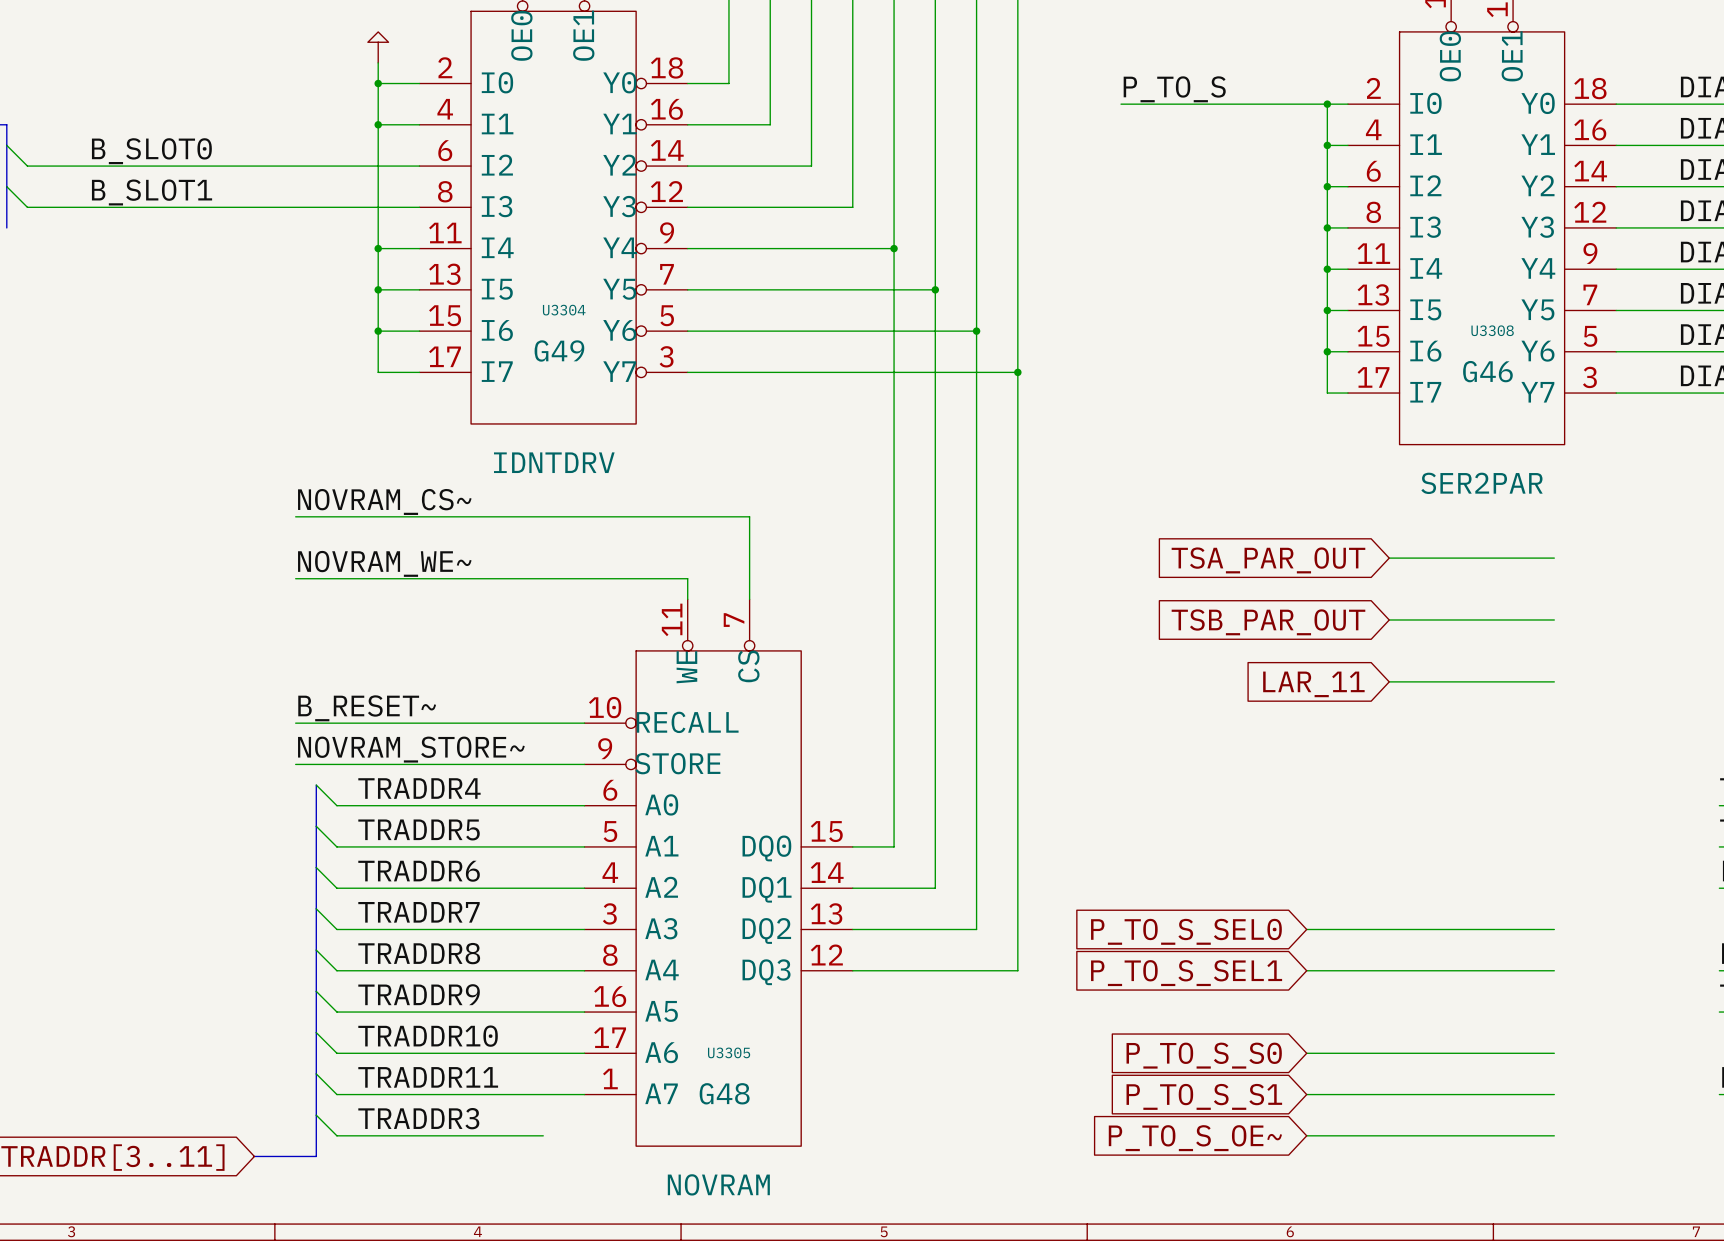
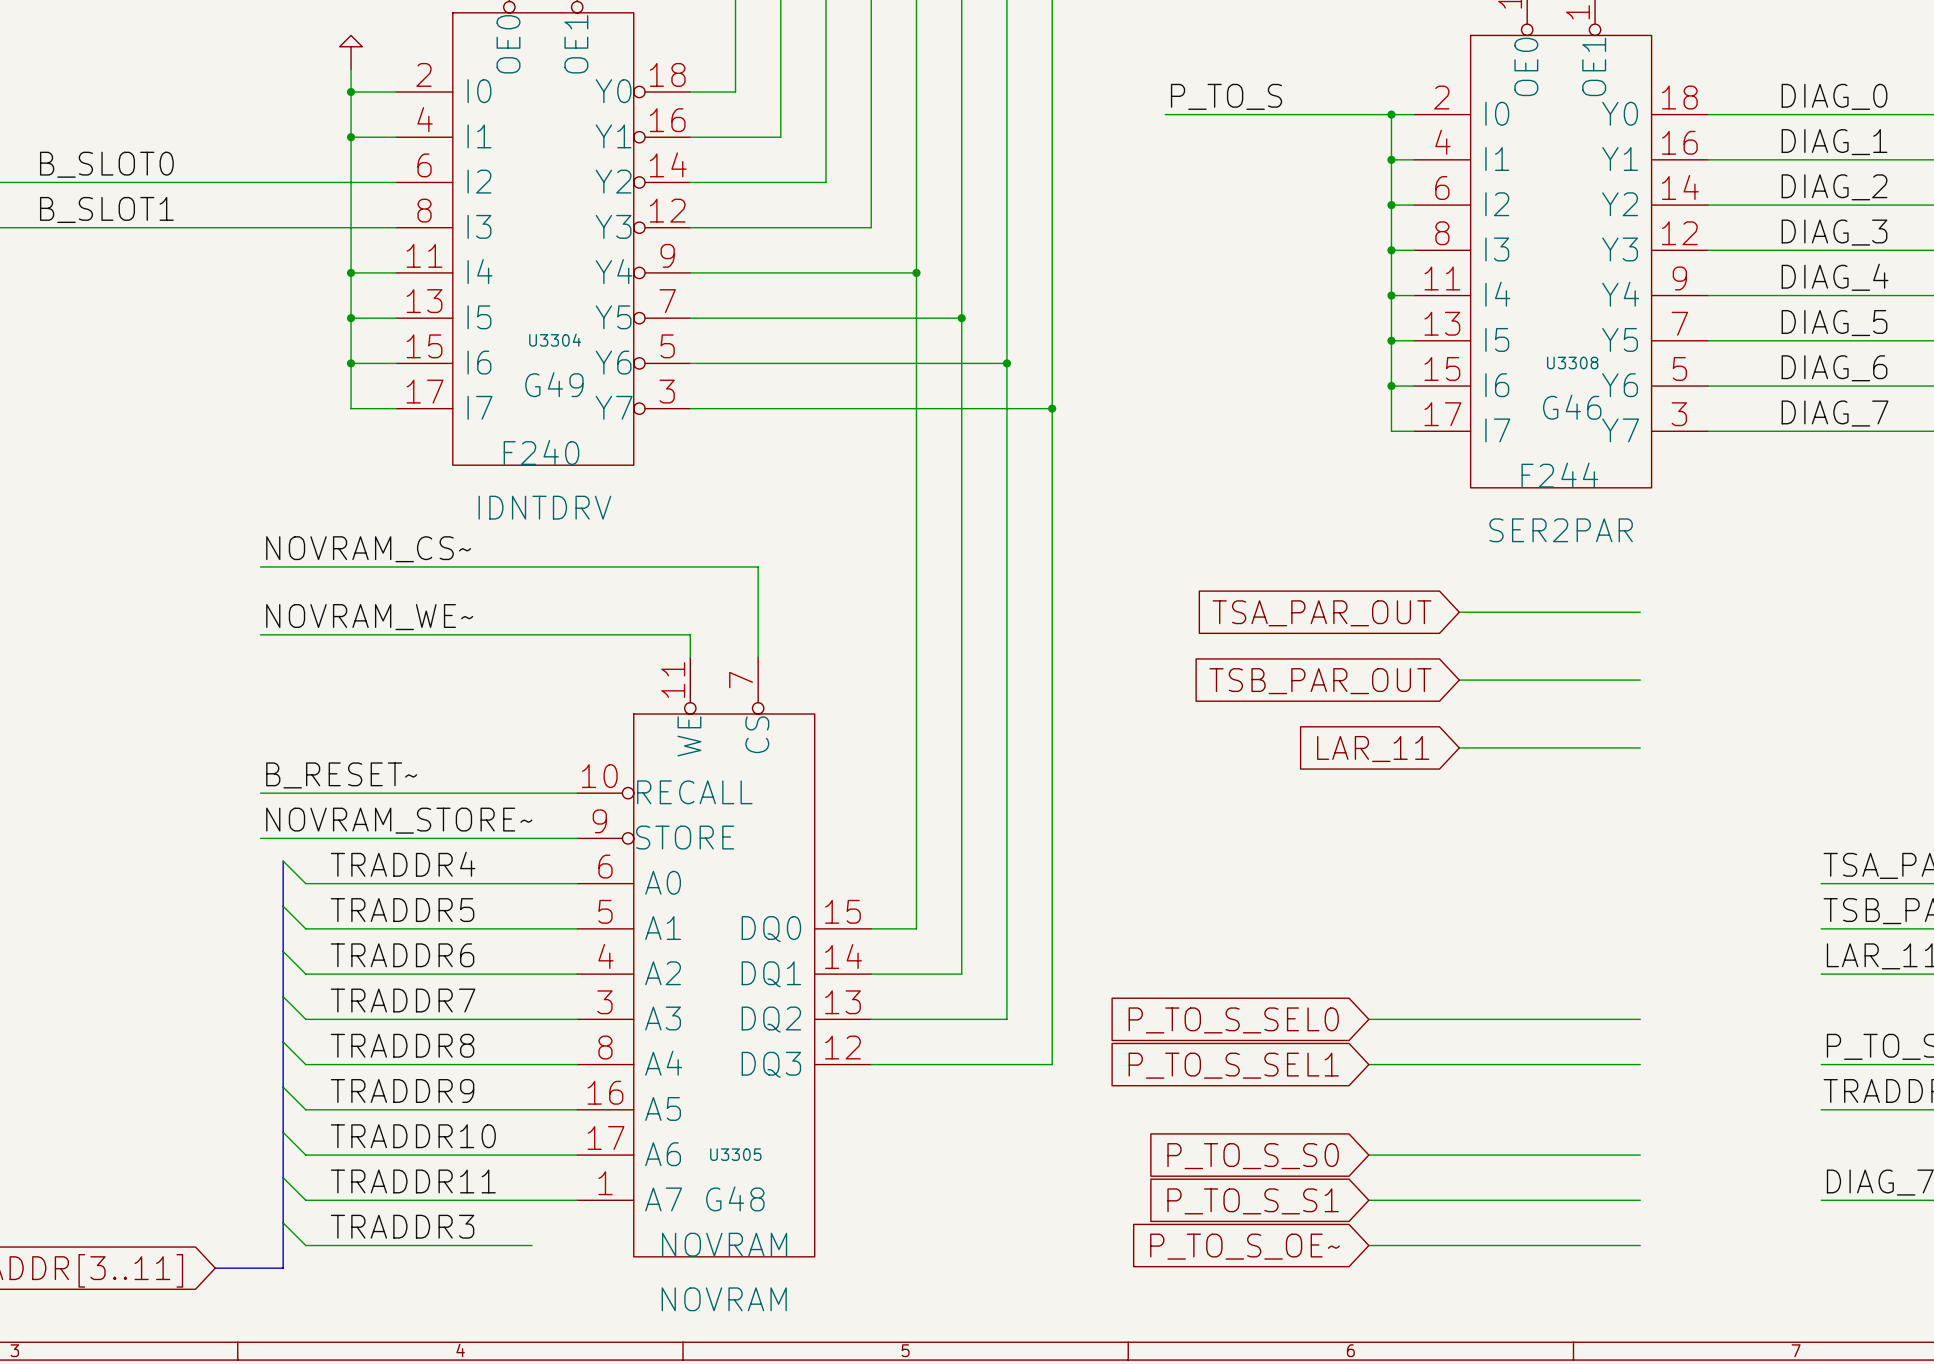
U3304 value: none -> F240 (541, 452)
U3308 value: none -> F244 (1559, 475)
U3305 value: none -> NOVRAM (724, 1244)

